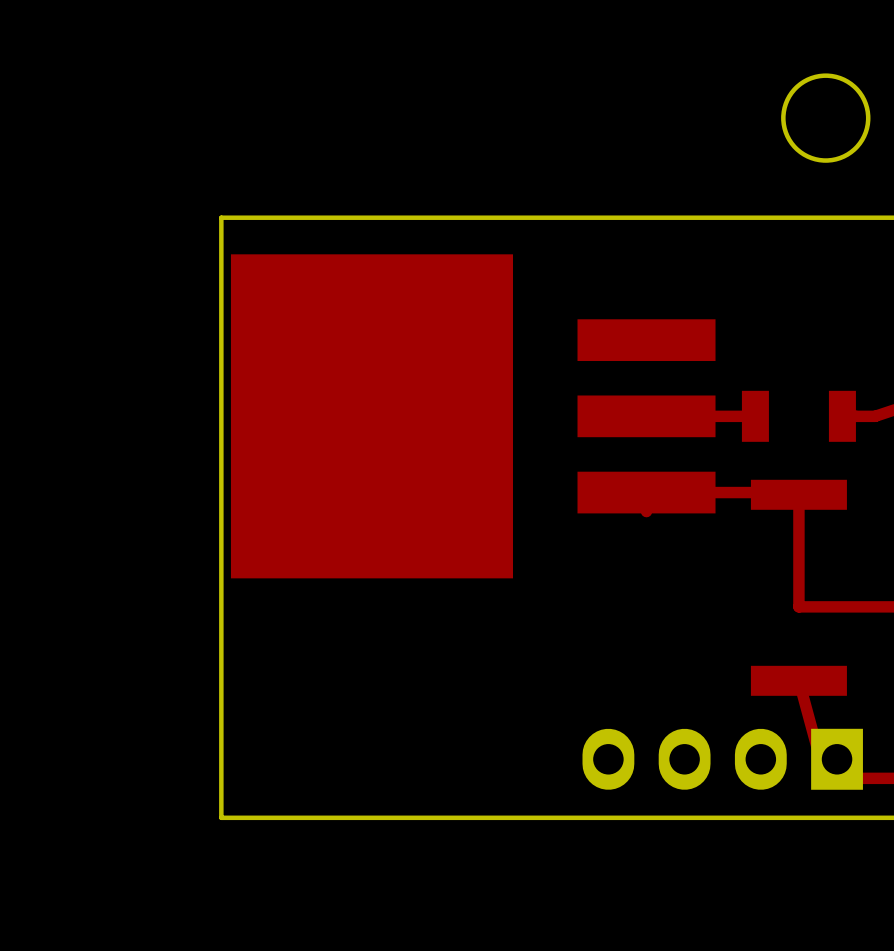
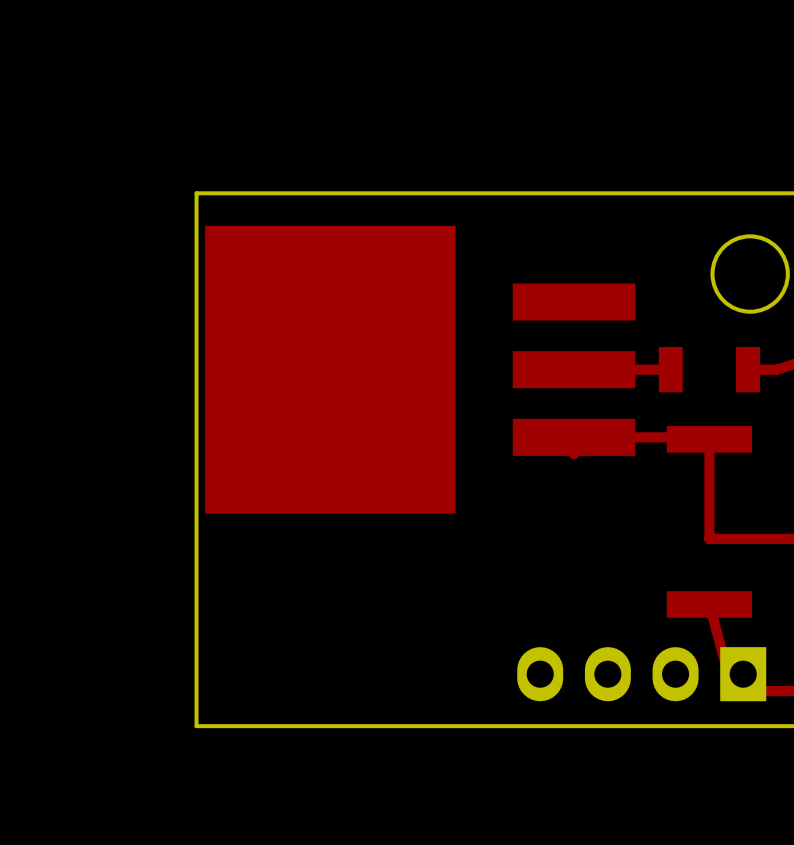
round board edge position: (825, 118) -> (750, 274)

